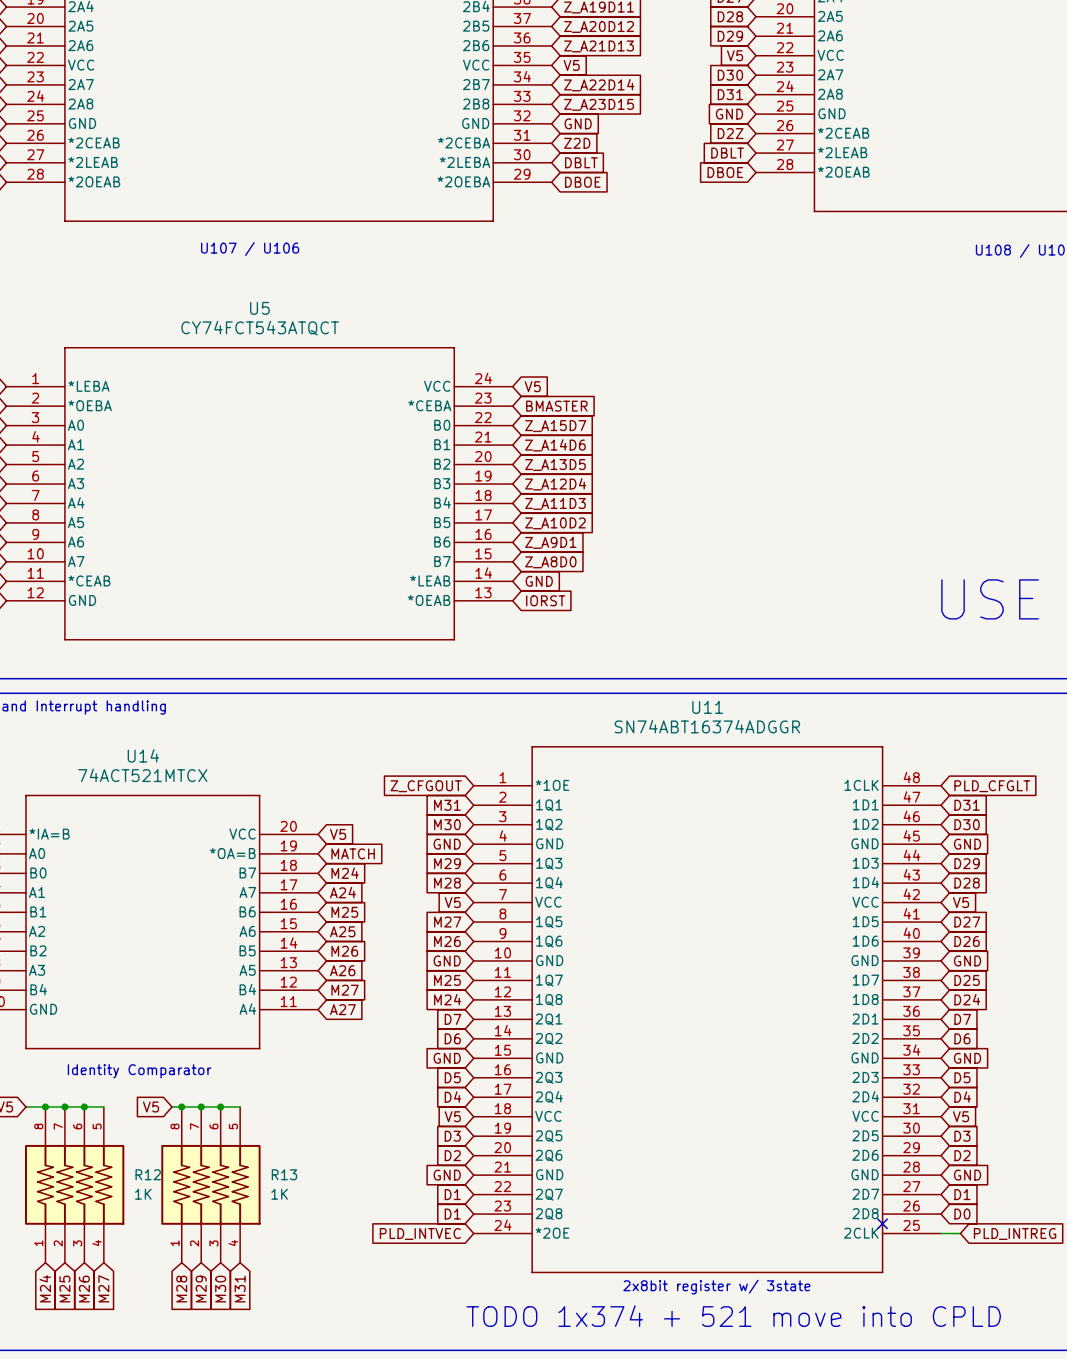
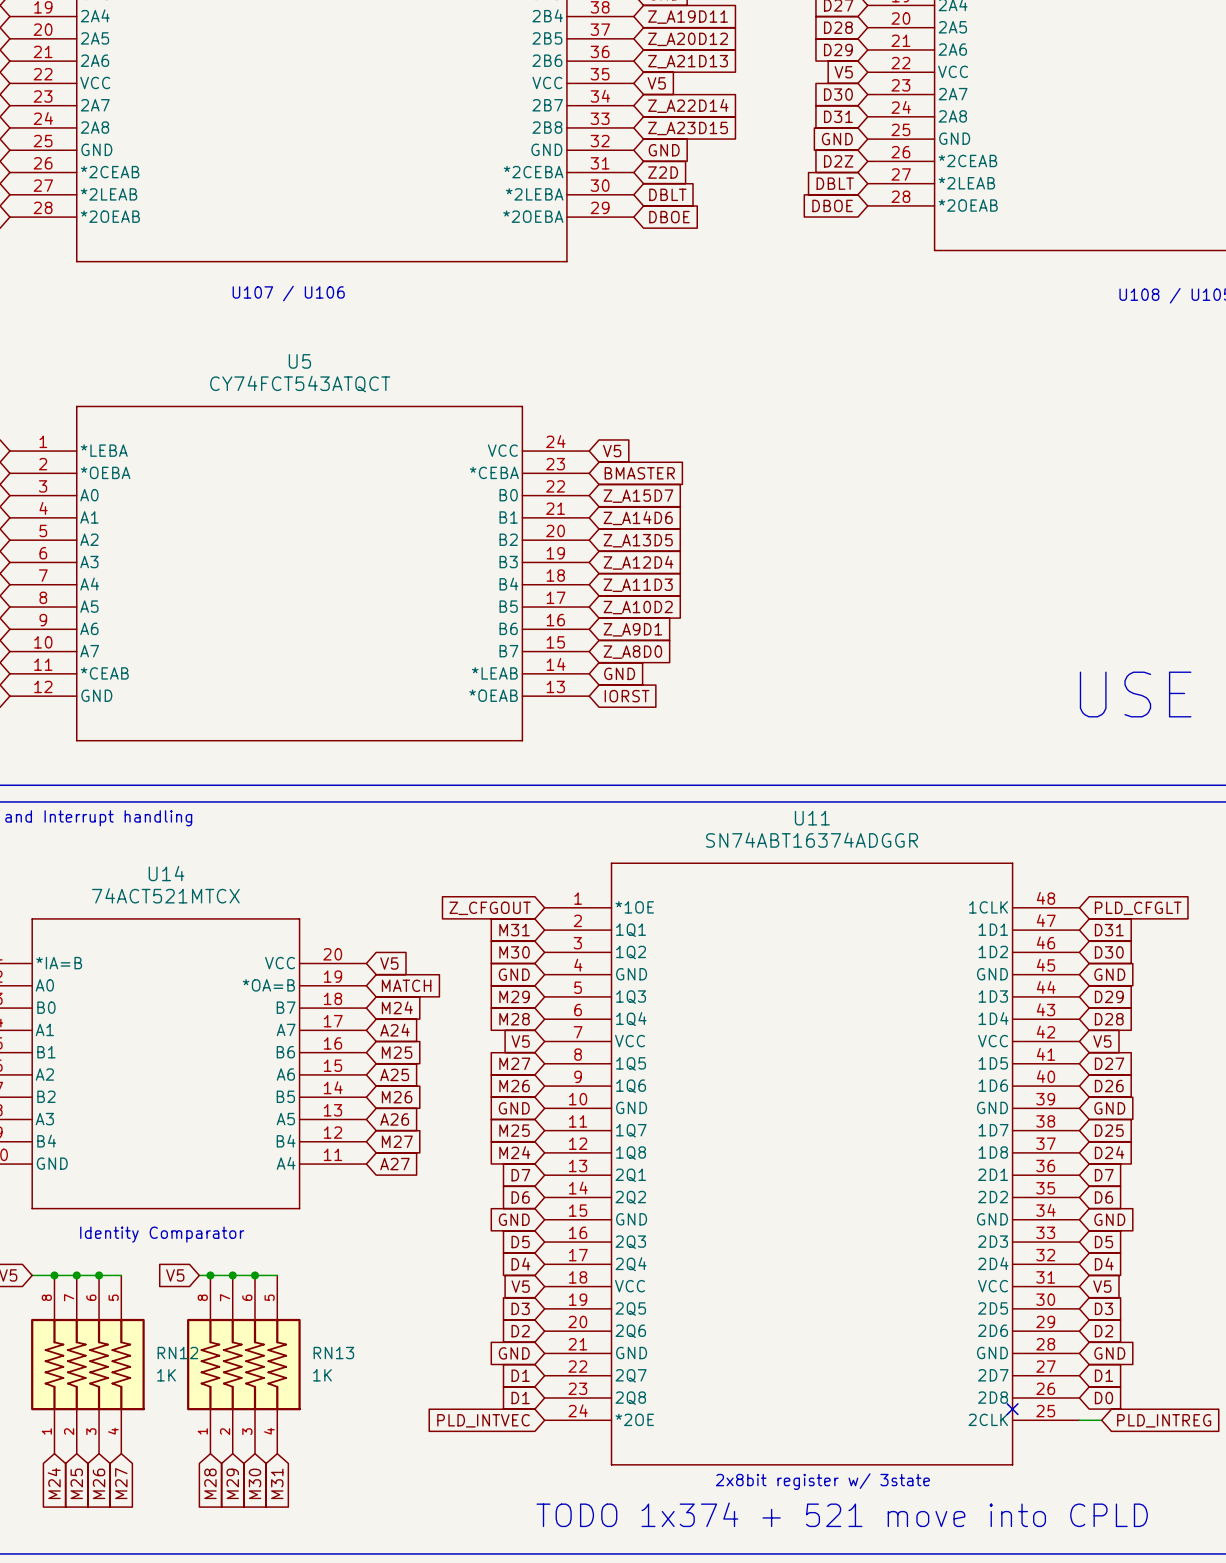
R12 name: R12 (148, 1174) -> RN12 (177, 1353)
R13 name: R13 (284, 1174) -> RN13 (333, 1353)

